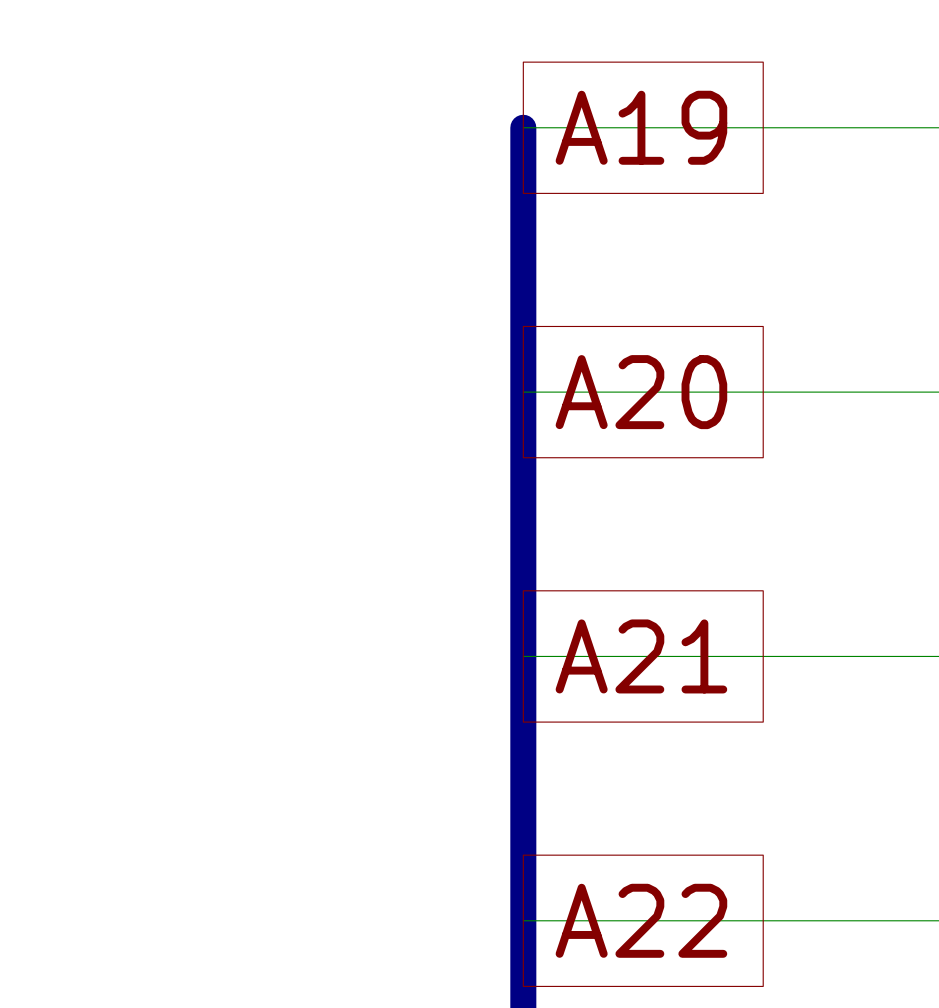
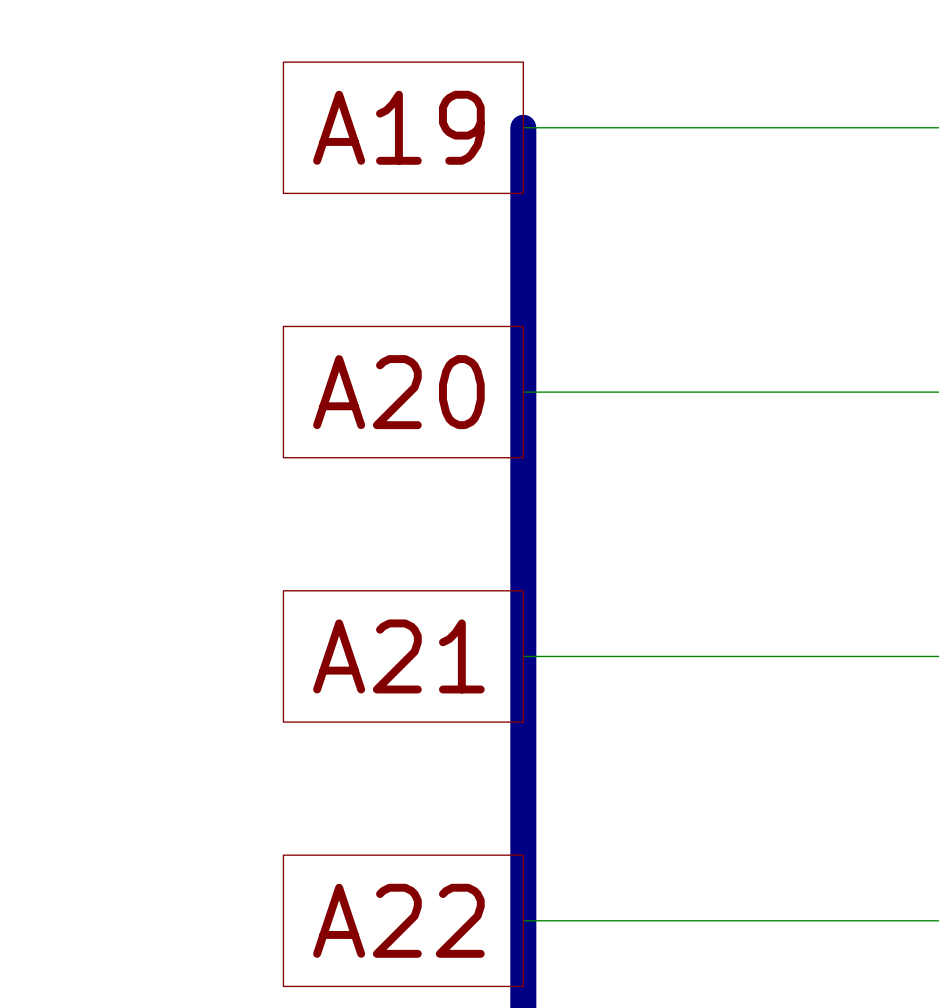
global label rotation: 0° (641, 127) -> 180° (398, 127)
global label rotation: 0° (641, 392) -> 180° (398, 392)
global label rotation: 0° (641, 656) -> 180° (398, 656)
global label rotation: 0° (641, 920) -> 180° (398, 920)

